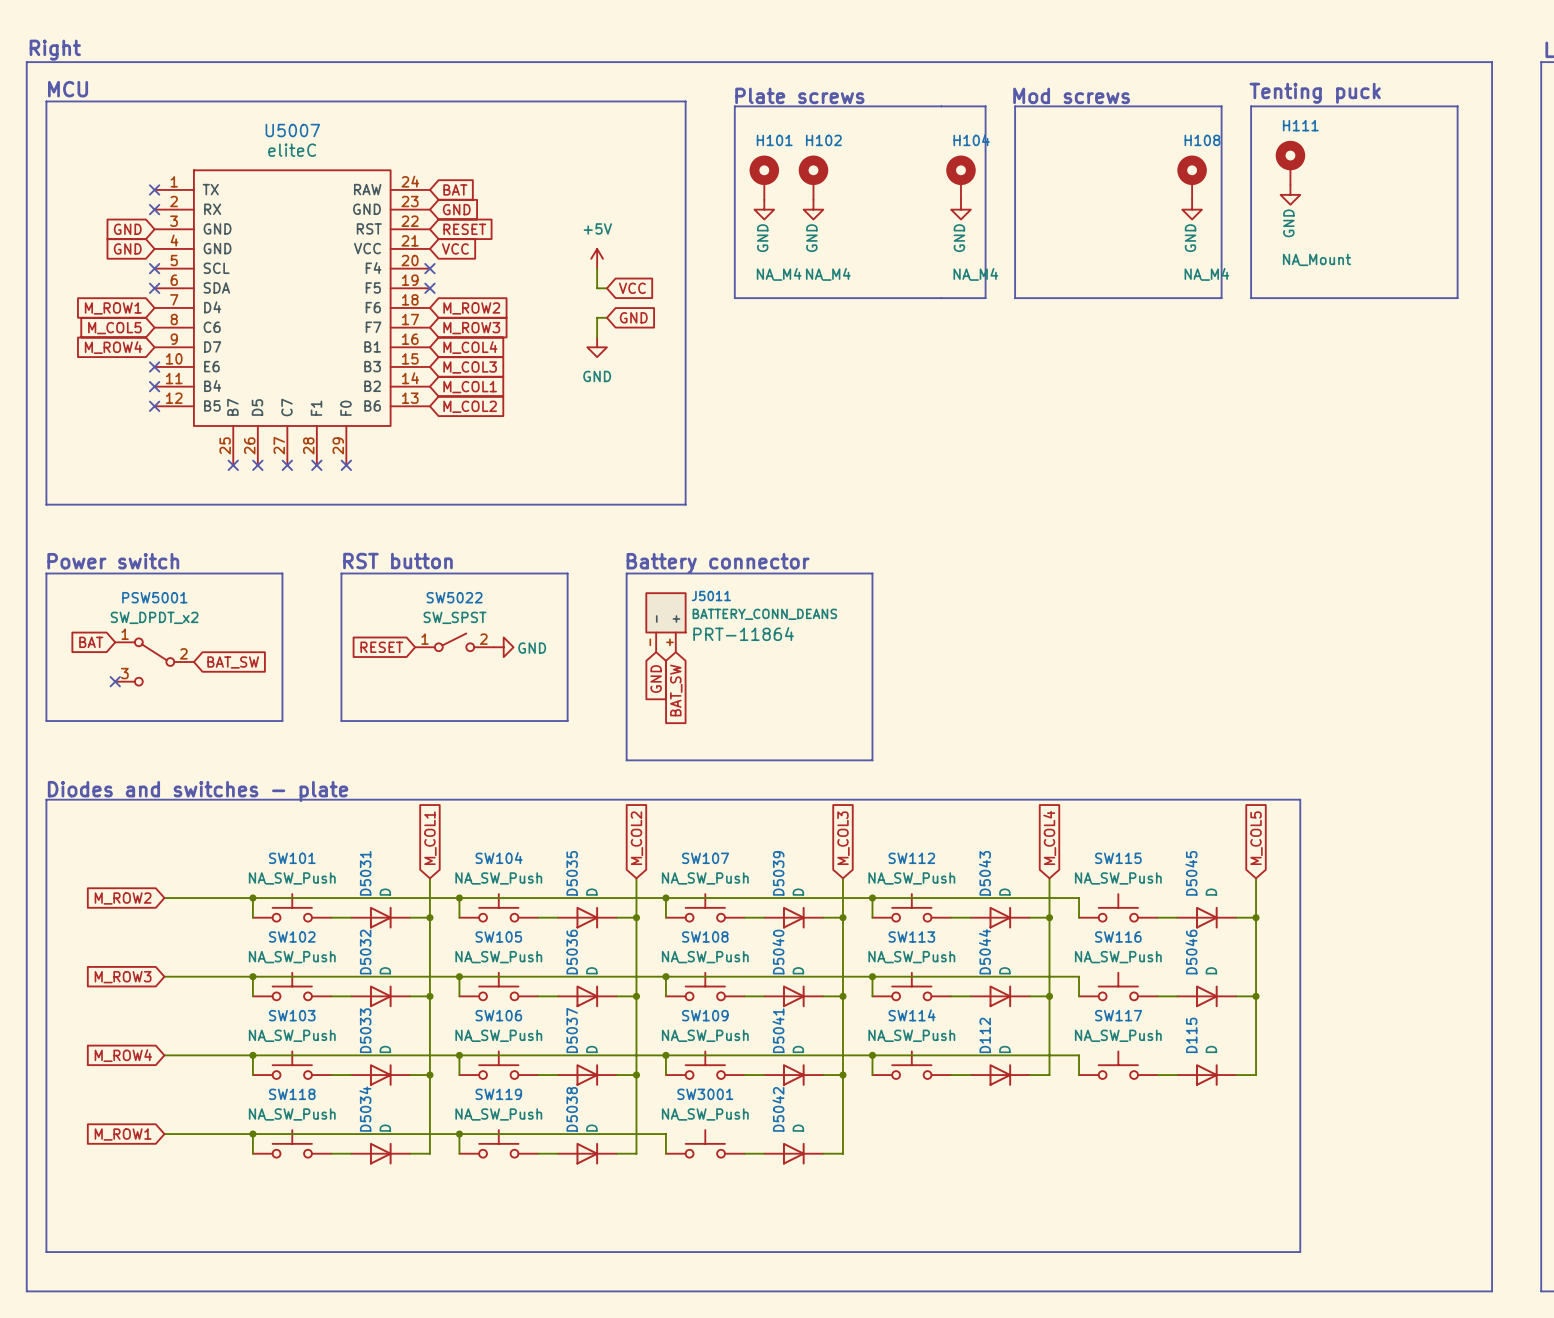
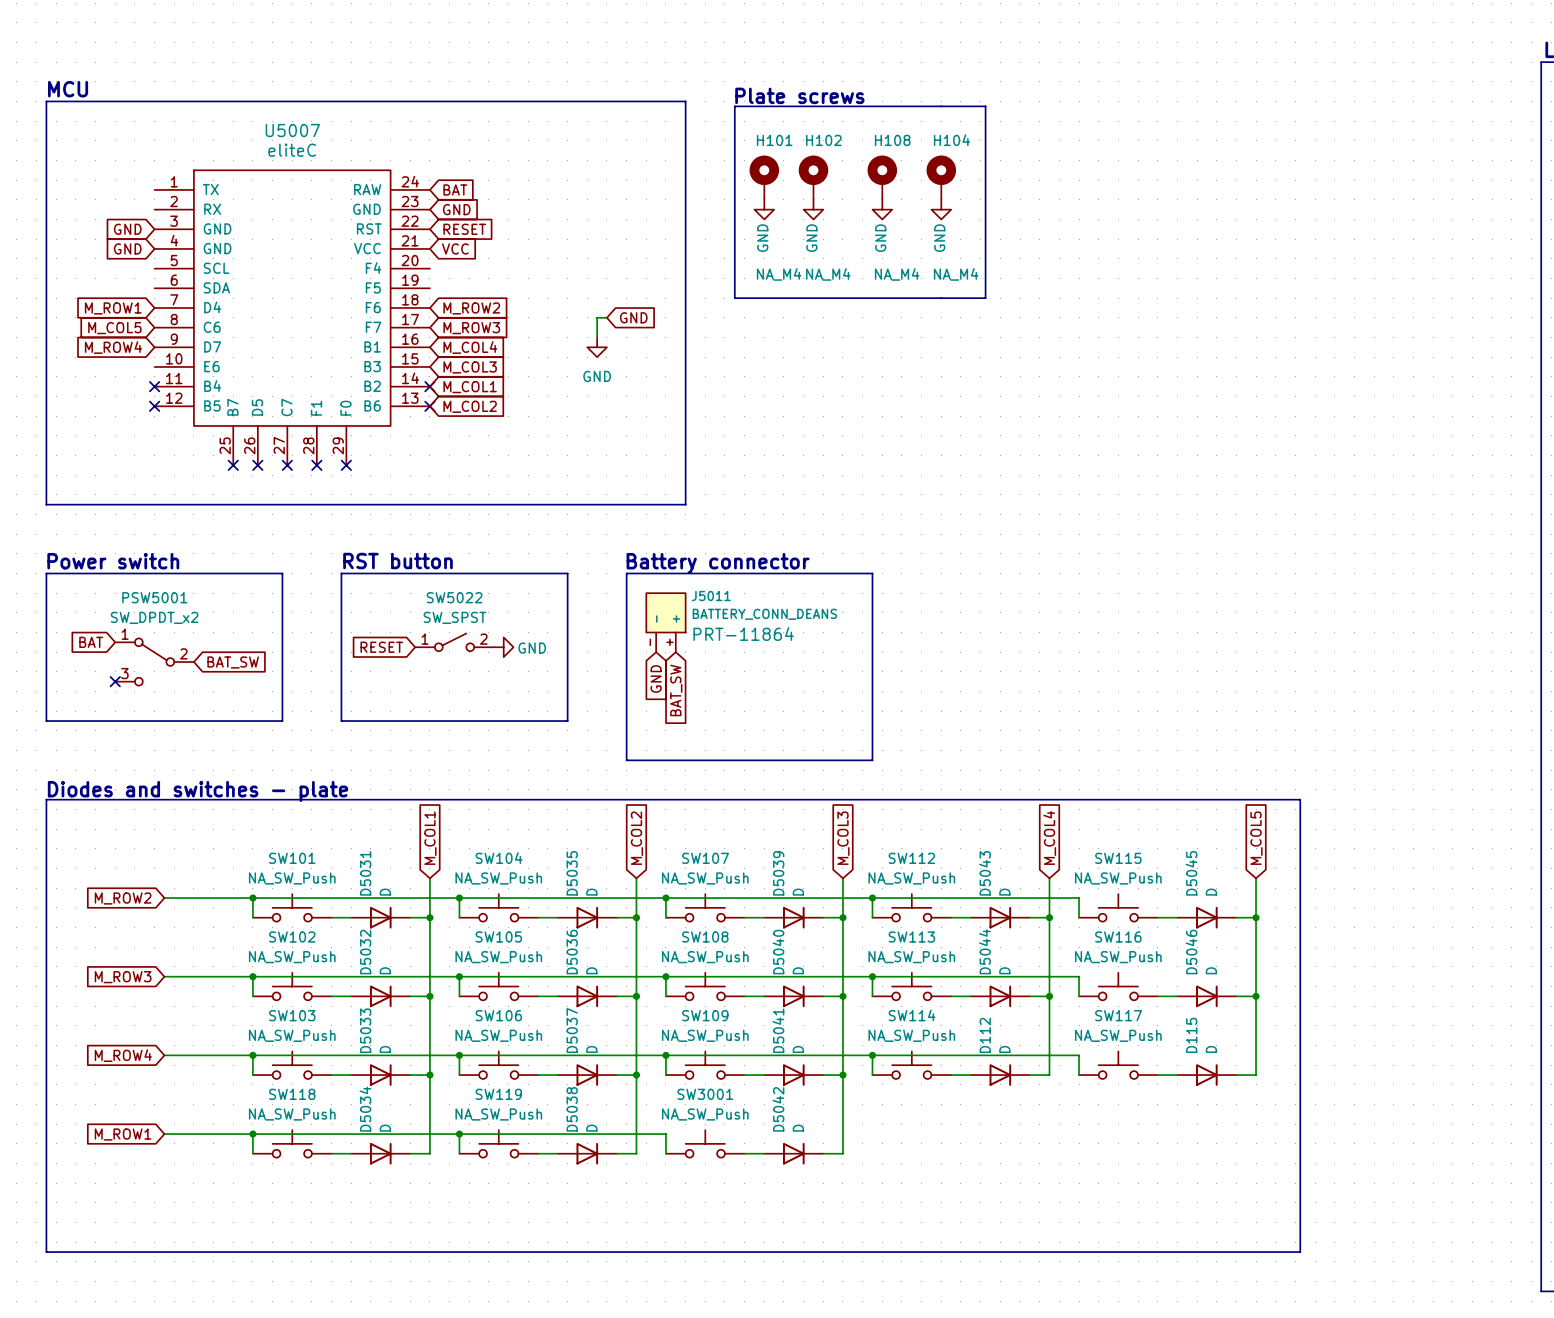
text: Right (55, 50) -> none
line: (26, 62) (1492, 62) (1492, 1291) (26, 1291) (26, 62) -> none
text: Tenting puck (1315, 93) -> none
text: Mod screws (1071, 95) -> none
line: (1015, 106) (1221, 106) (1221, 298) (1015, 298) (1015, 106) -> none
line: (1251, 106) (1251, 298) (1457, 298) (1457, 106) (1251, 106) -> none
H111: NA_Mount (1290, 162) -> none
H104 position: (960, 177) -> (941, 177)
H108 position: (1192, 177) -> (882, 177)
no-connect mark: (154, 189) -> none
power symbol: GND (1290, 194) -> none
no-connect mark: (154, 209) -> none
power symbol: none -> GND (882, 209)
power symbol position: GND (960, 209) -> GND (941, 209)
power symbol: GND (1192, 209) -> none
power symbol: +5V (597, 258) -> none
no-connect mark: (154, 268) -> none
no-connect mark: (429, 268) -> none
wire: (597, 268) (597, 288) (606, 288) -> none
no-connect mark: (154, 288) -> none
no-connect mark: (429, 288) -> none
global label: VCC (632, 288) -> none
no-connect mark: (154, 366) -> none
no-connect mark: none -> (429, 386)
no-connect mark: none -> (429, 406)

